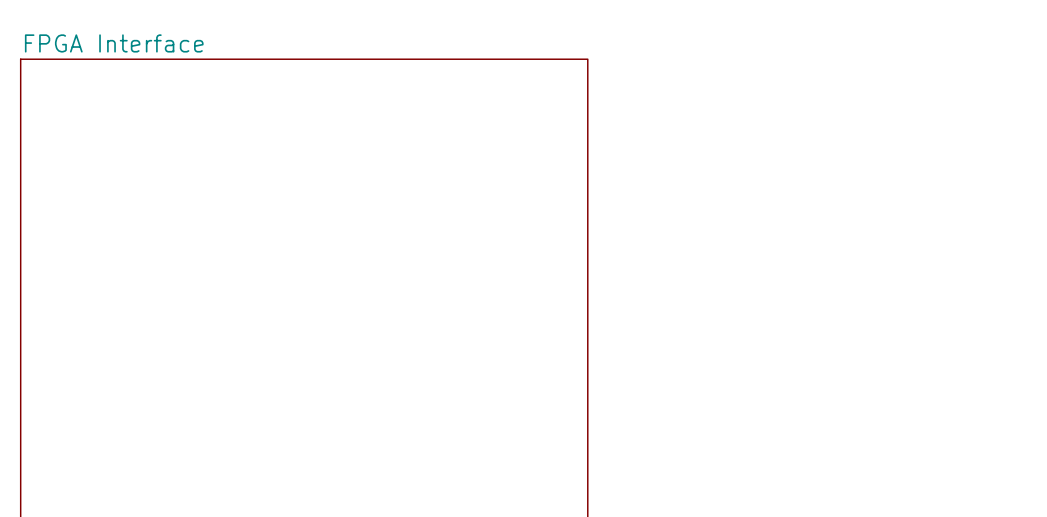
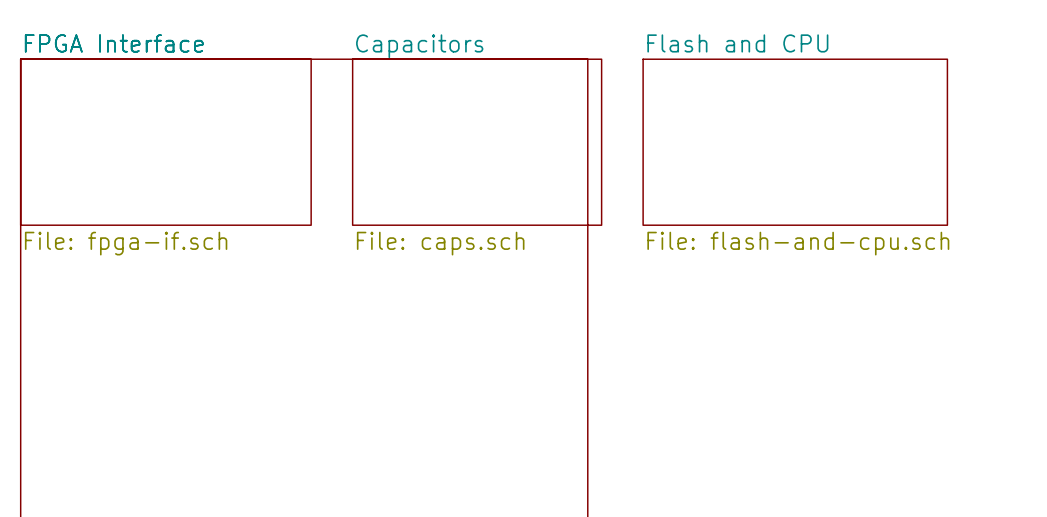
sheet FPGA Interface: none -> File: fpga-if.sch (165, 142)
sheet Capacitors: none -> File: caps.sch (477, 142)
sheet Flash and CPU: none -> File: flash-and-cpu.sch (795, 142)

